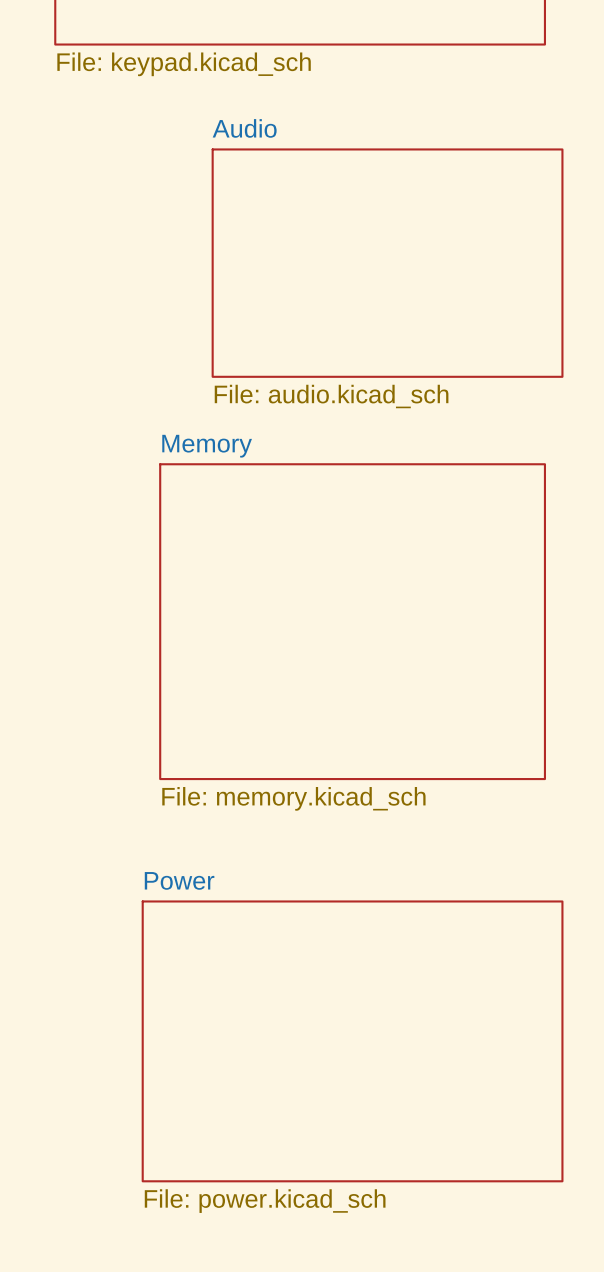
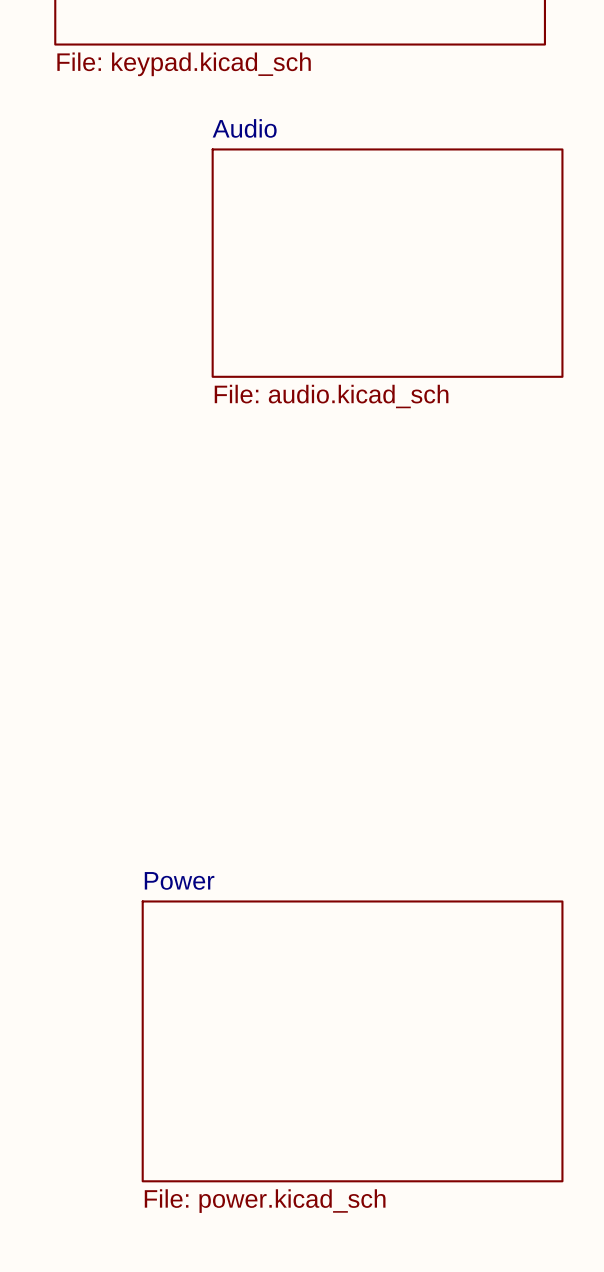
sheet Memory: File: memory.kicad_sch (352, 621) -> none

